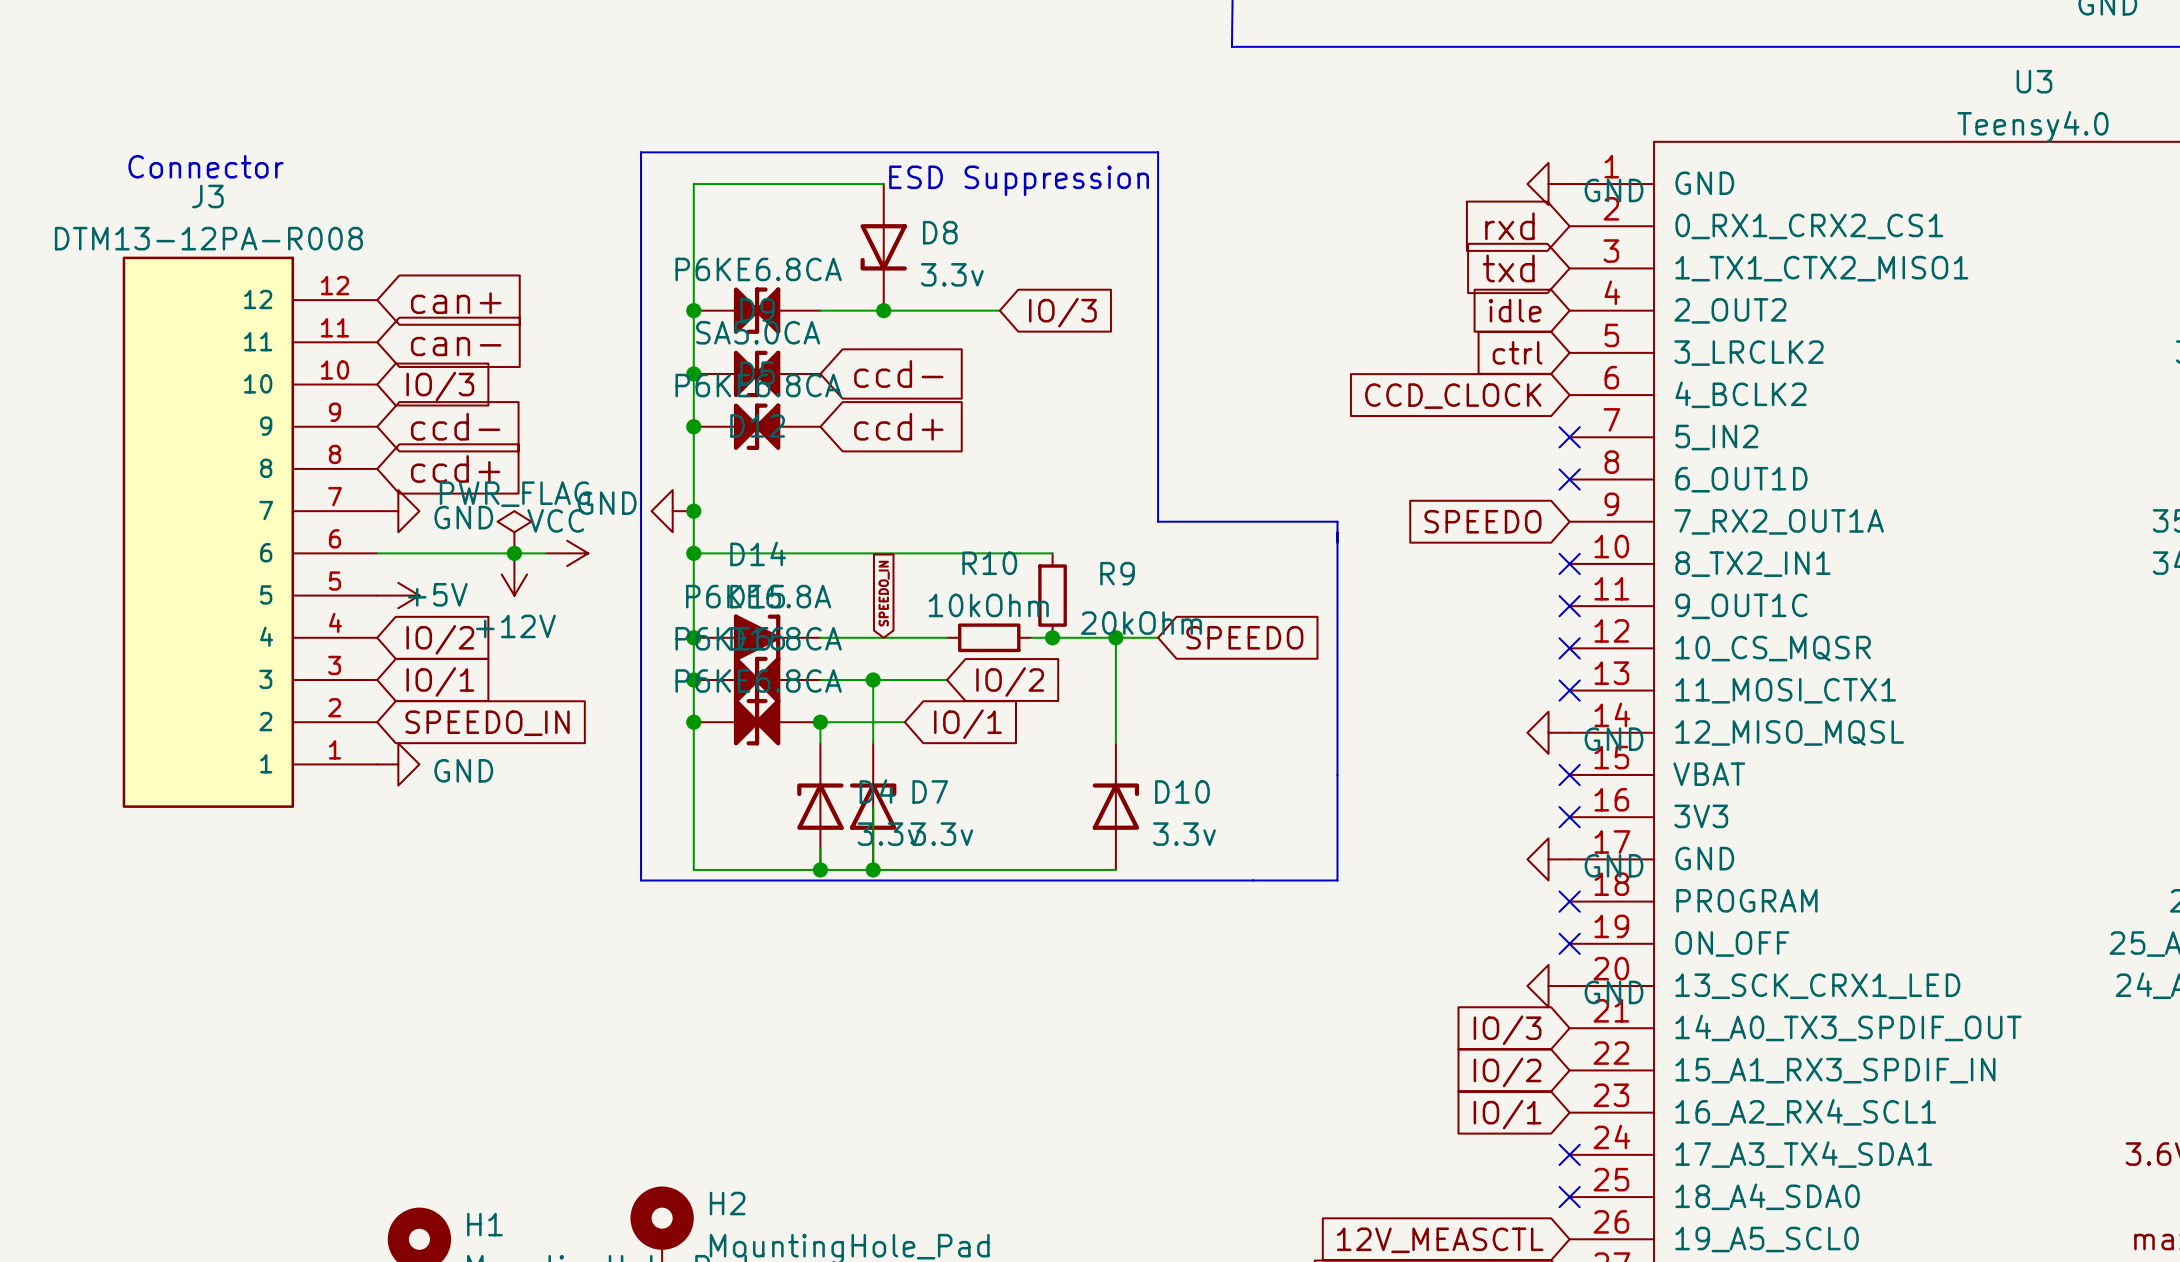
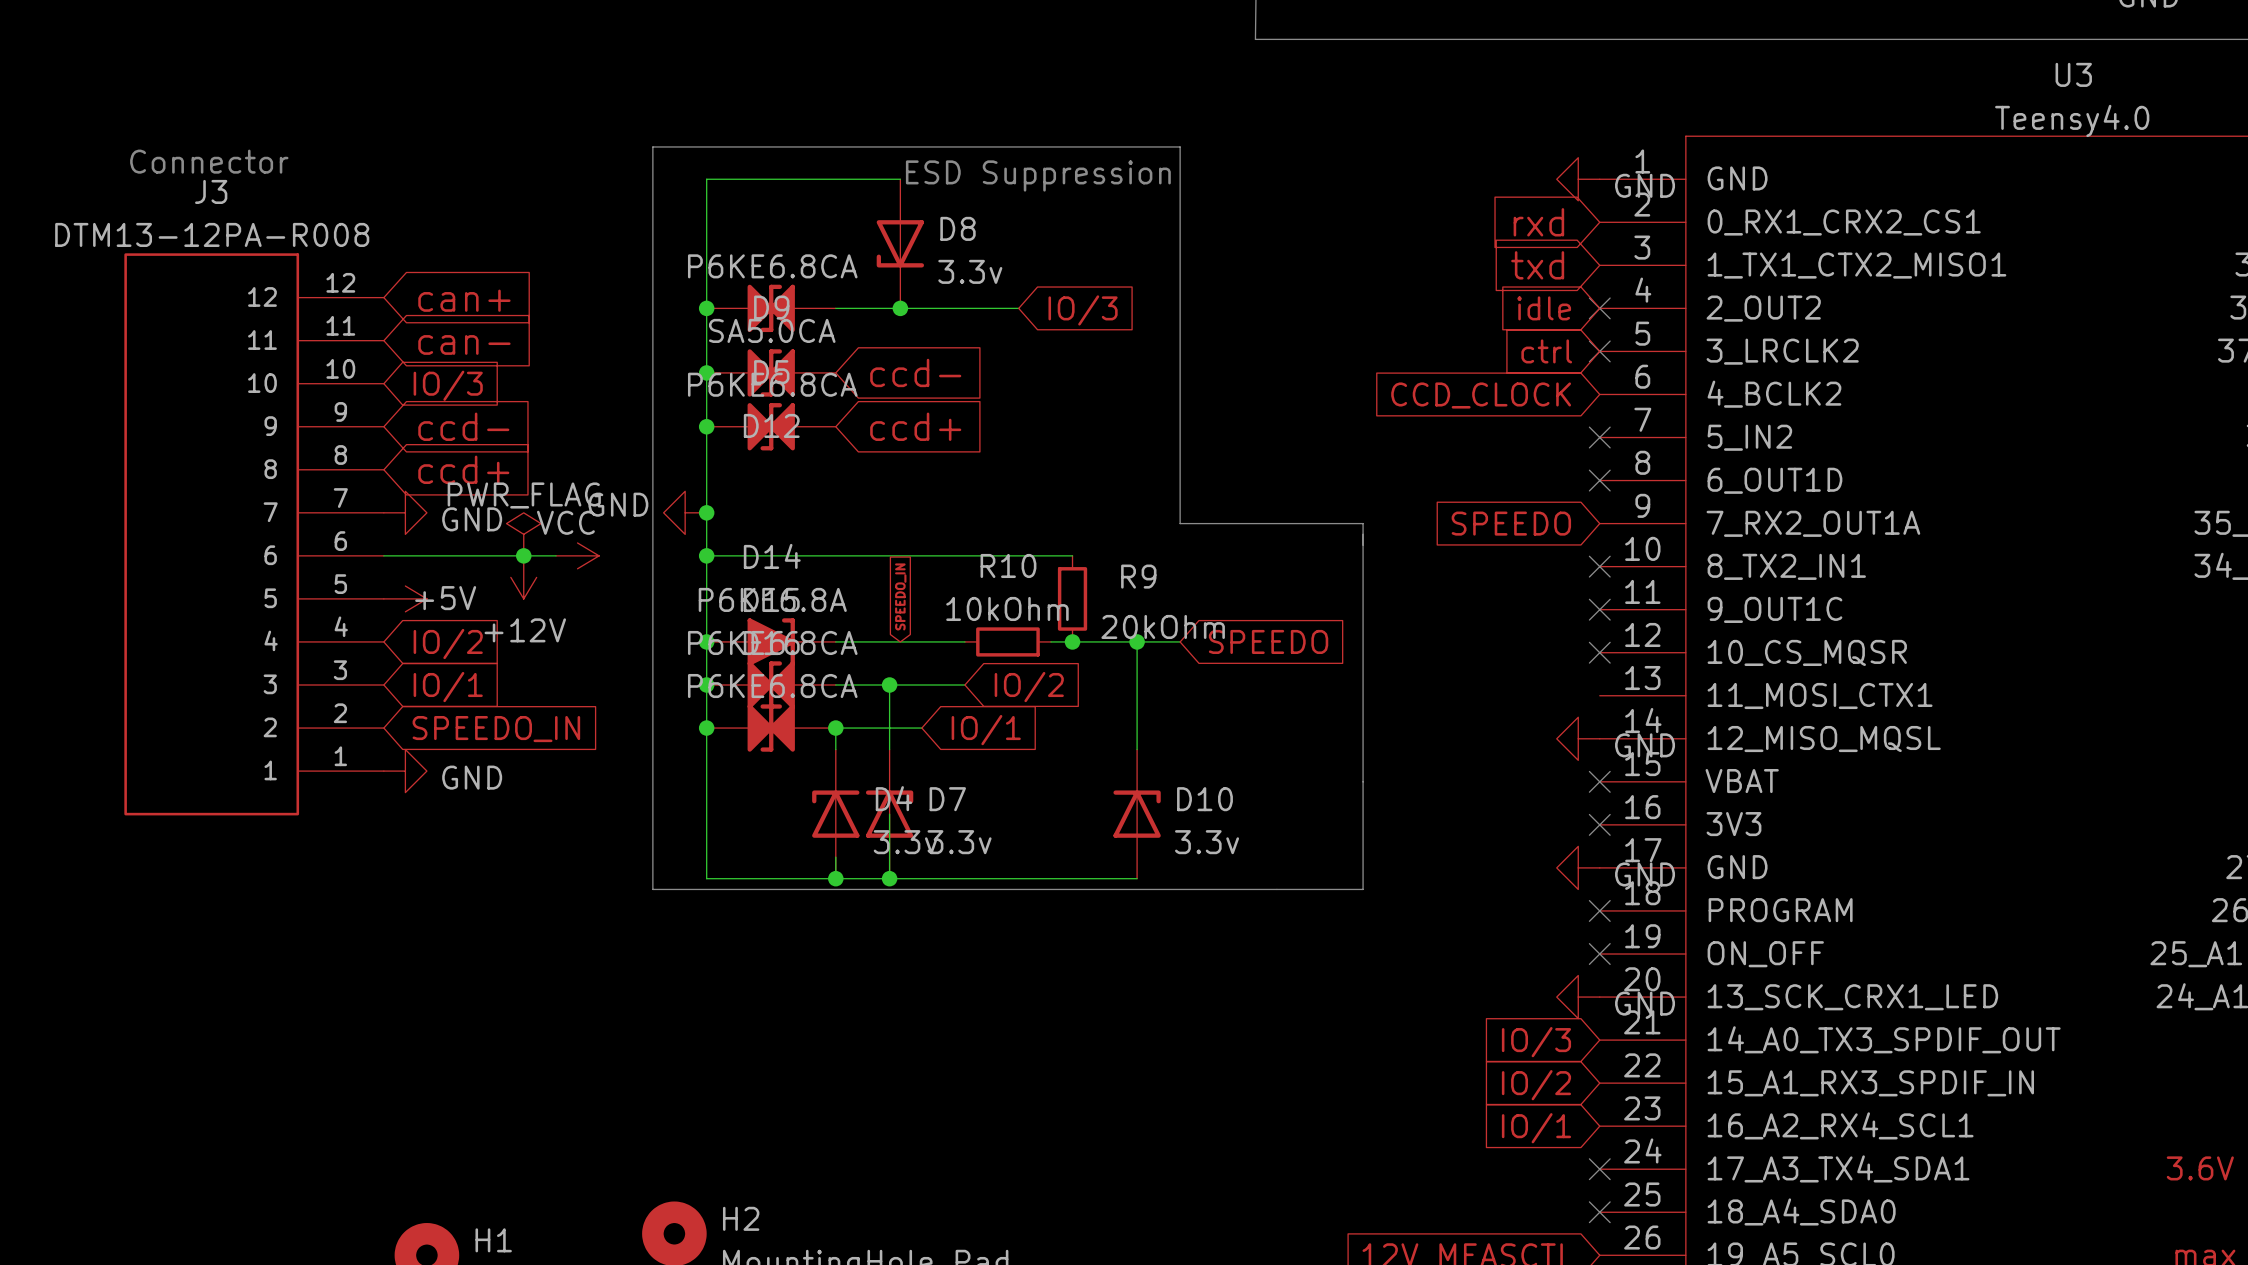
no-connect mark: none -> (1599, 308)
no-connect mark: none -> (1599, 351)
no-connect mark: (1569, 690) -> none

